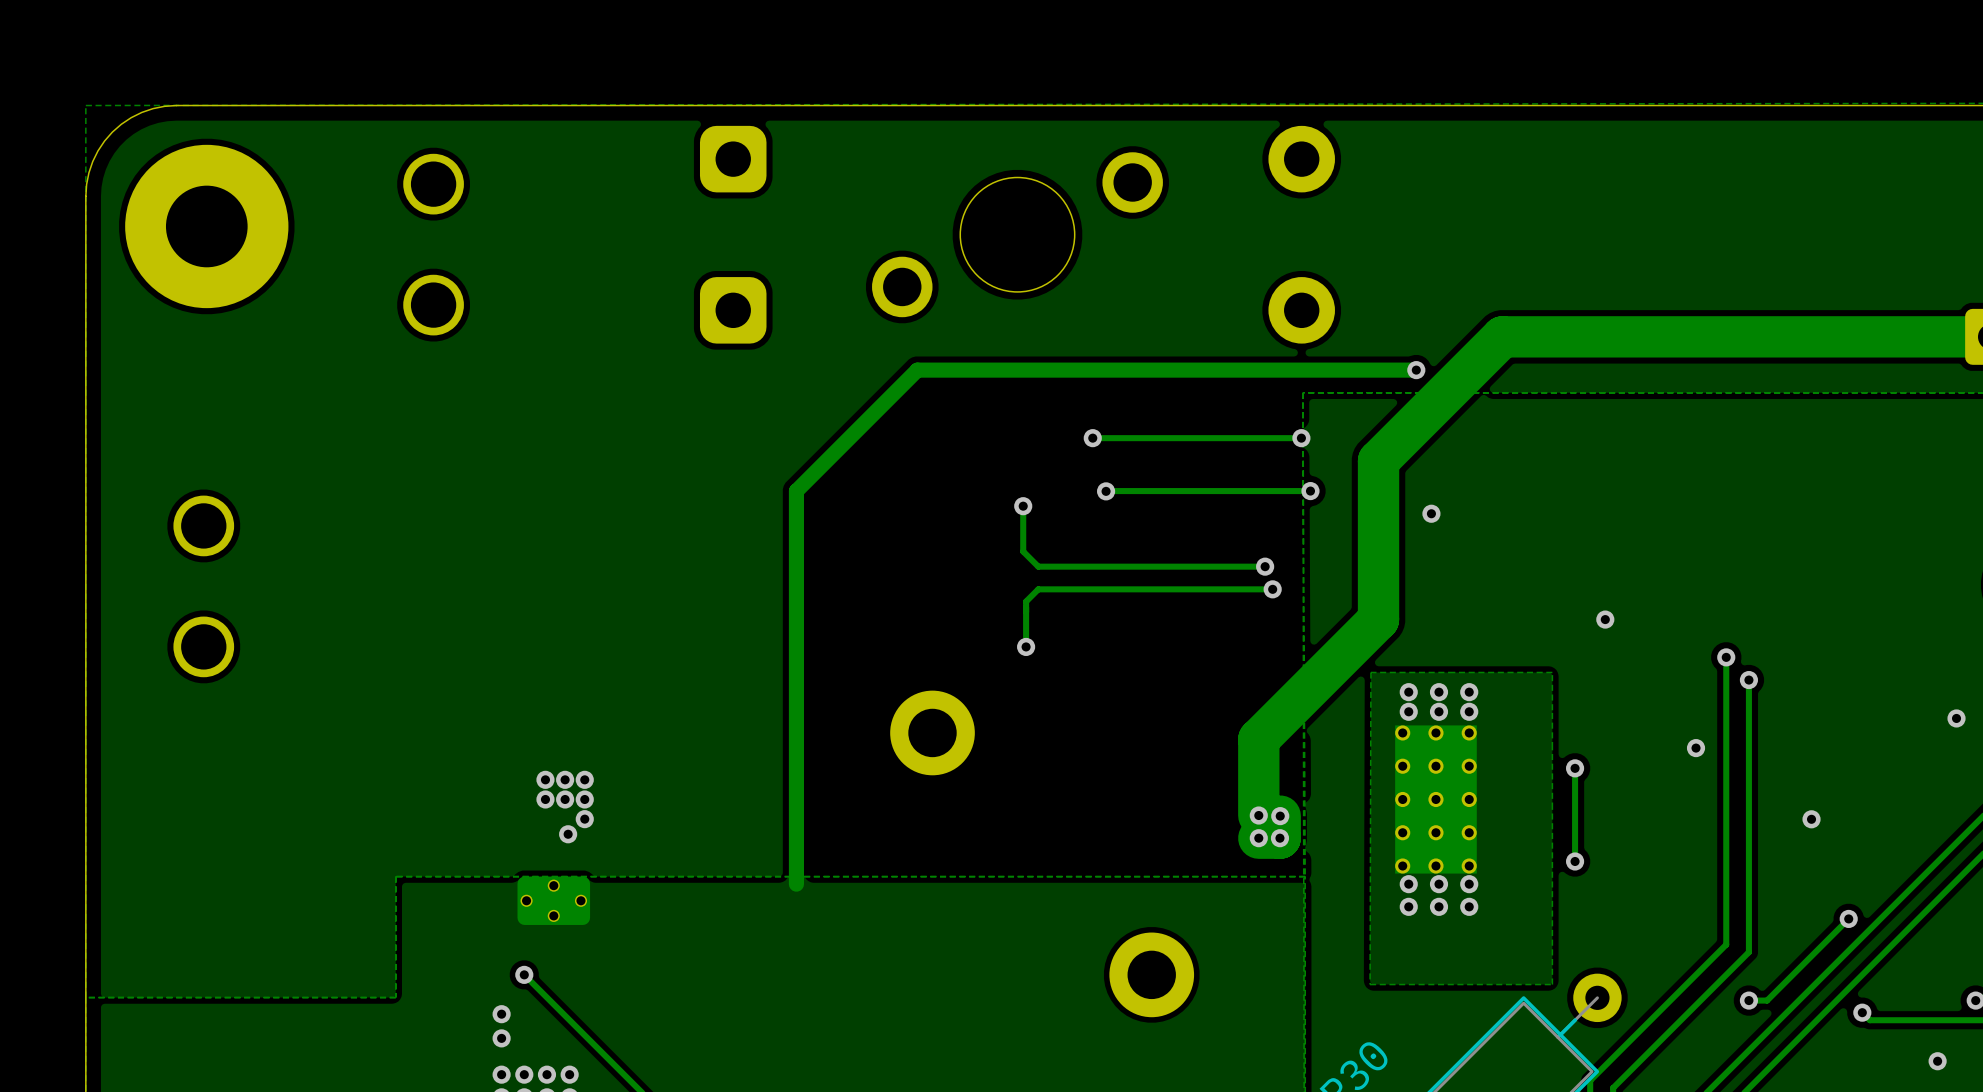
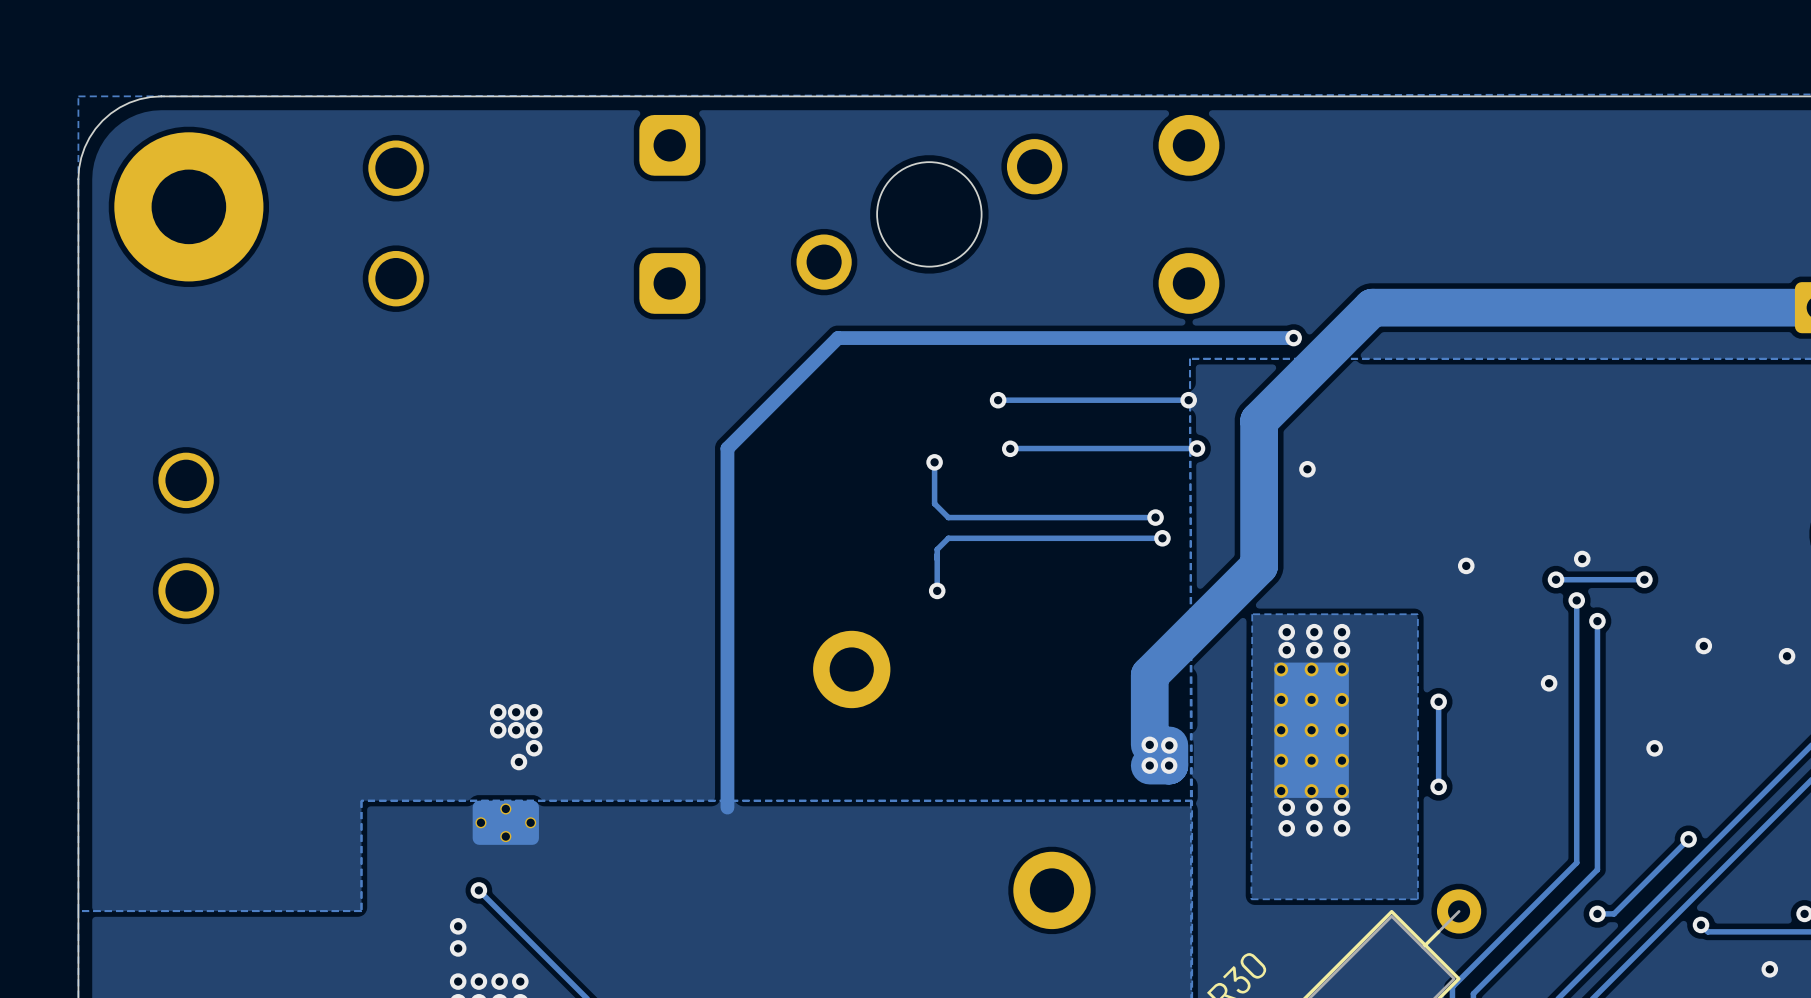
via: none -> (1582, 559)
via: none -> (1556, 579)
track: none -> (1644, 579) (1556, 579)
via: none -> (1644, 579)
via: none -> (1703, 646)

